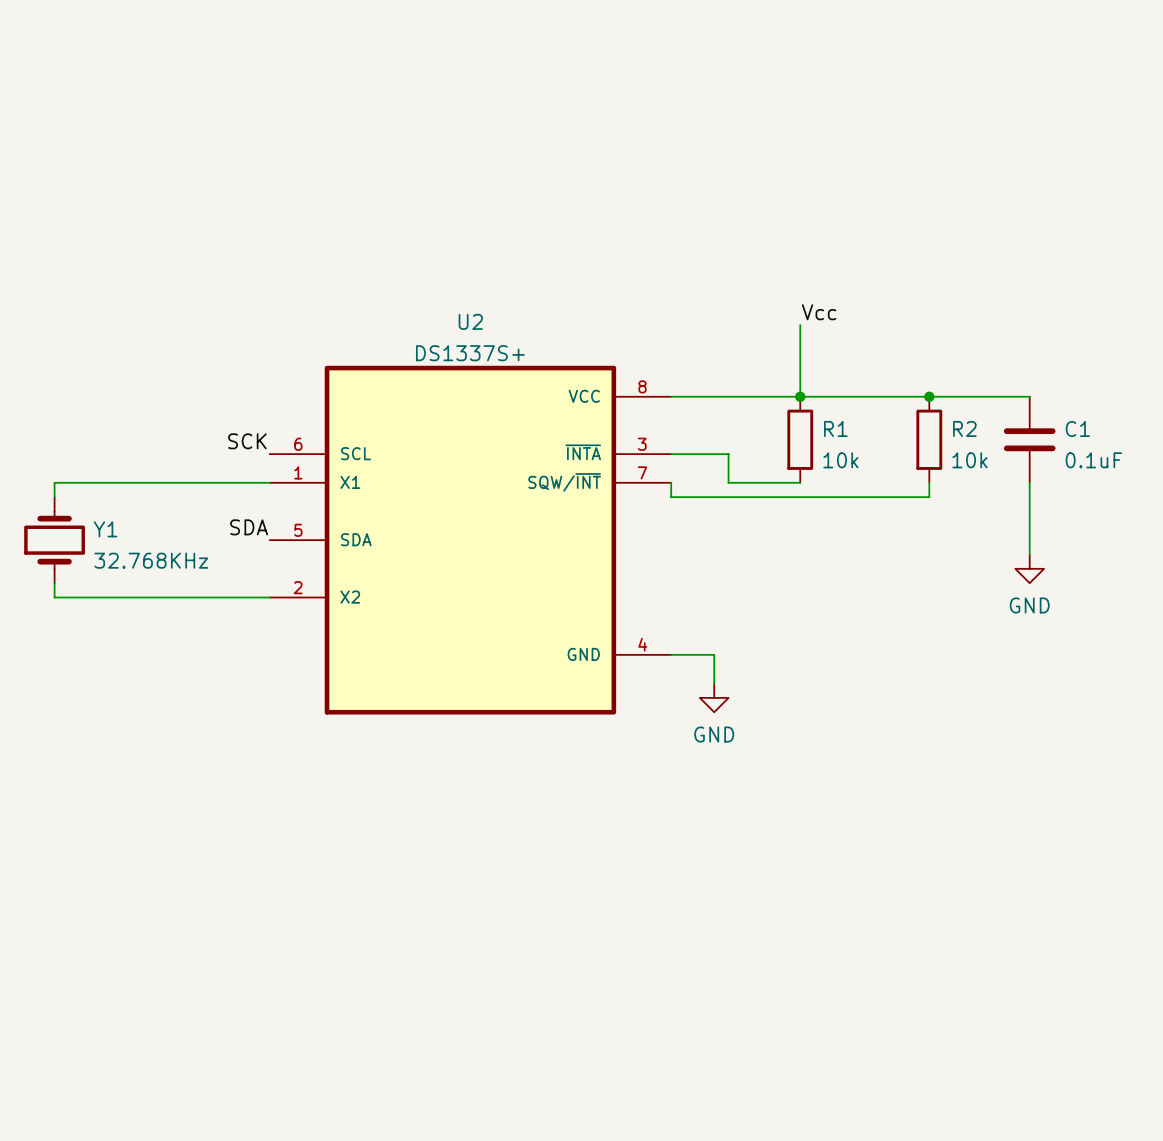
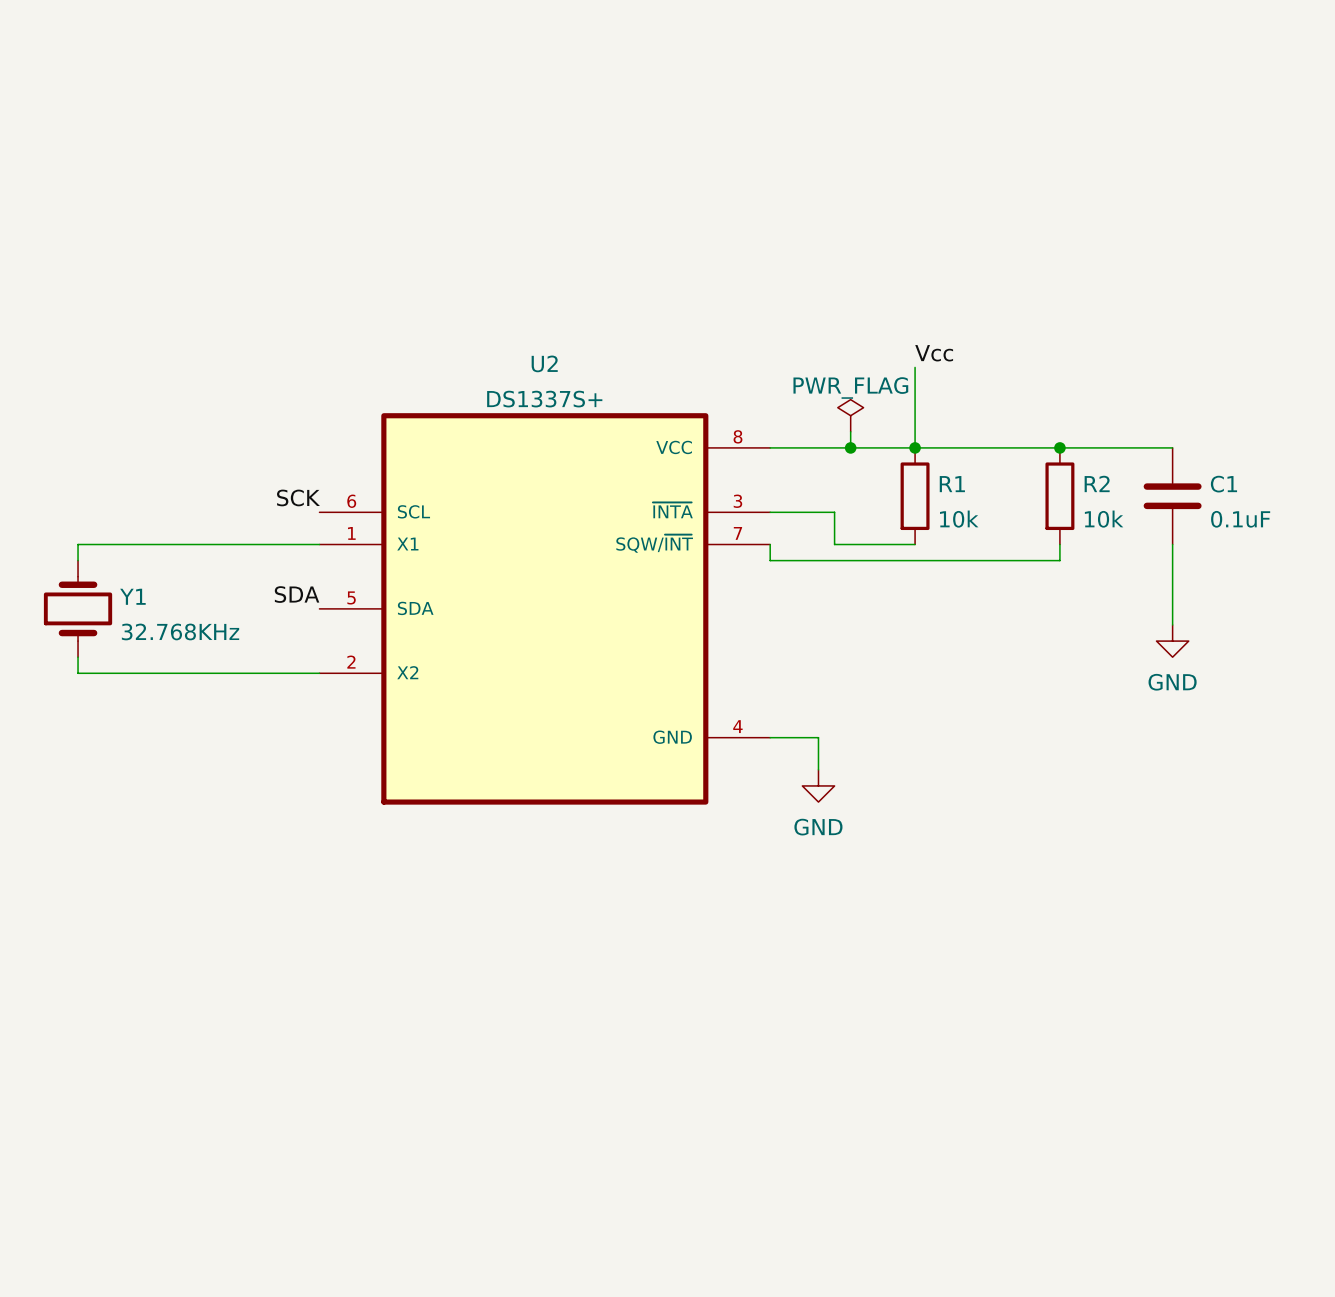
power symbol: none -> PWR_FLAG (850, 415)
wire: none -> (850, 431) (850, 447)
junction: none -> (850, 447)

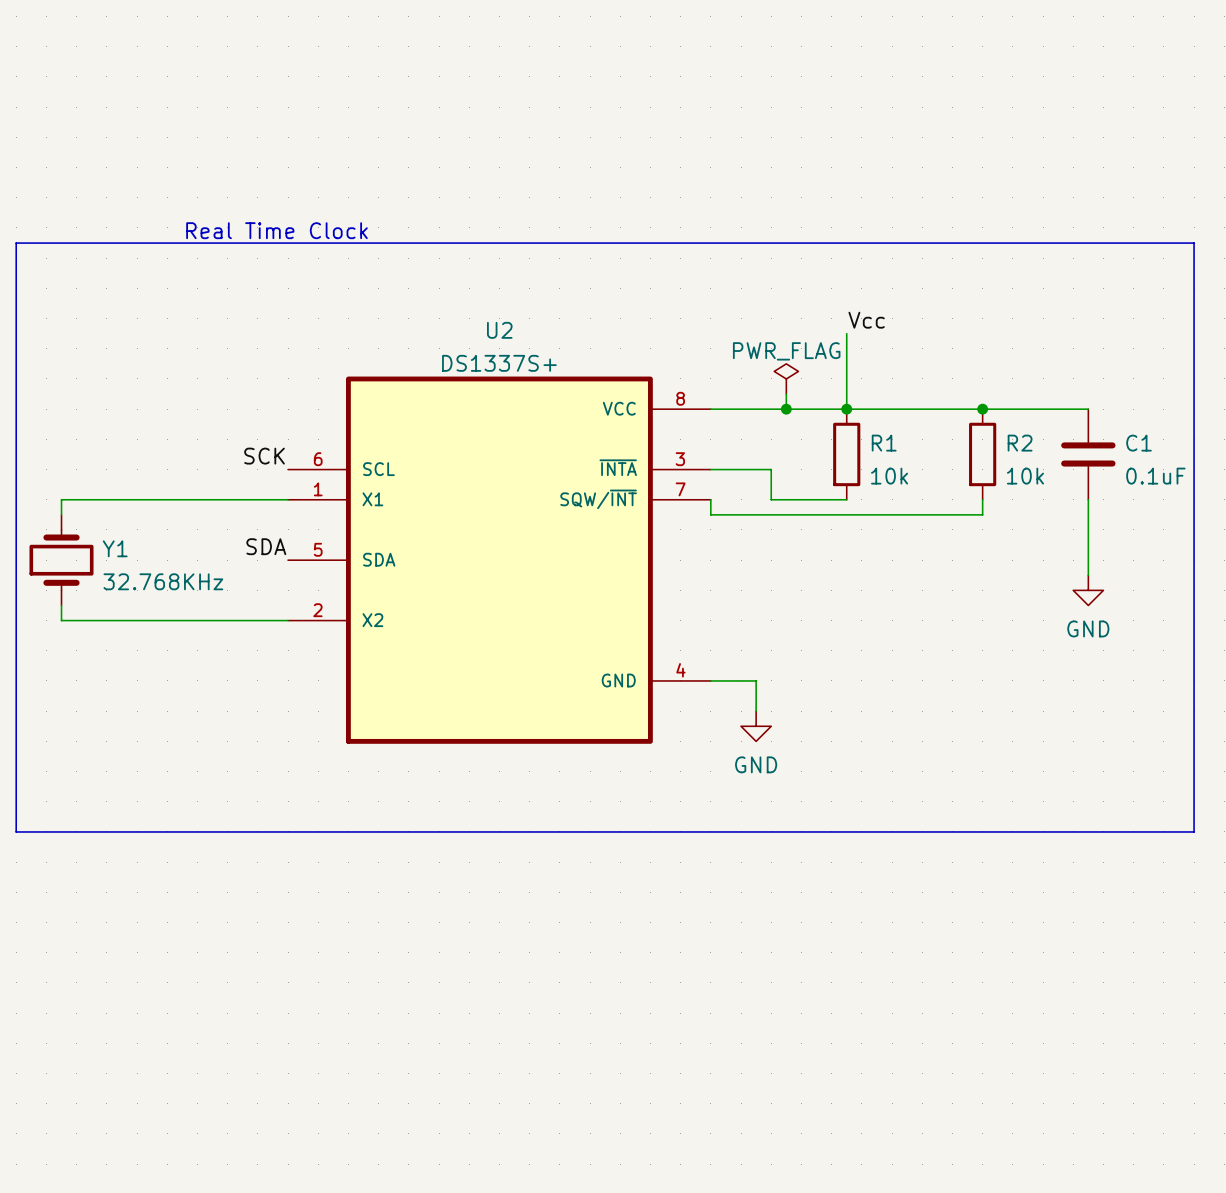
text: none -> Real Time Clock (276, 230)
line: none -> (16, 243) (16, 831) (1194, 831) (1194, 243) (16, 243)

